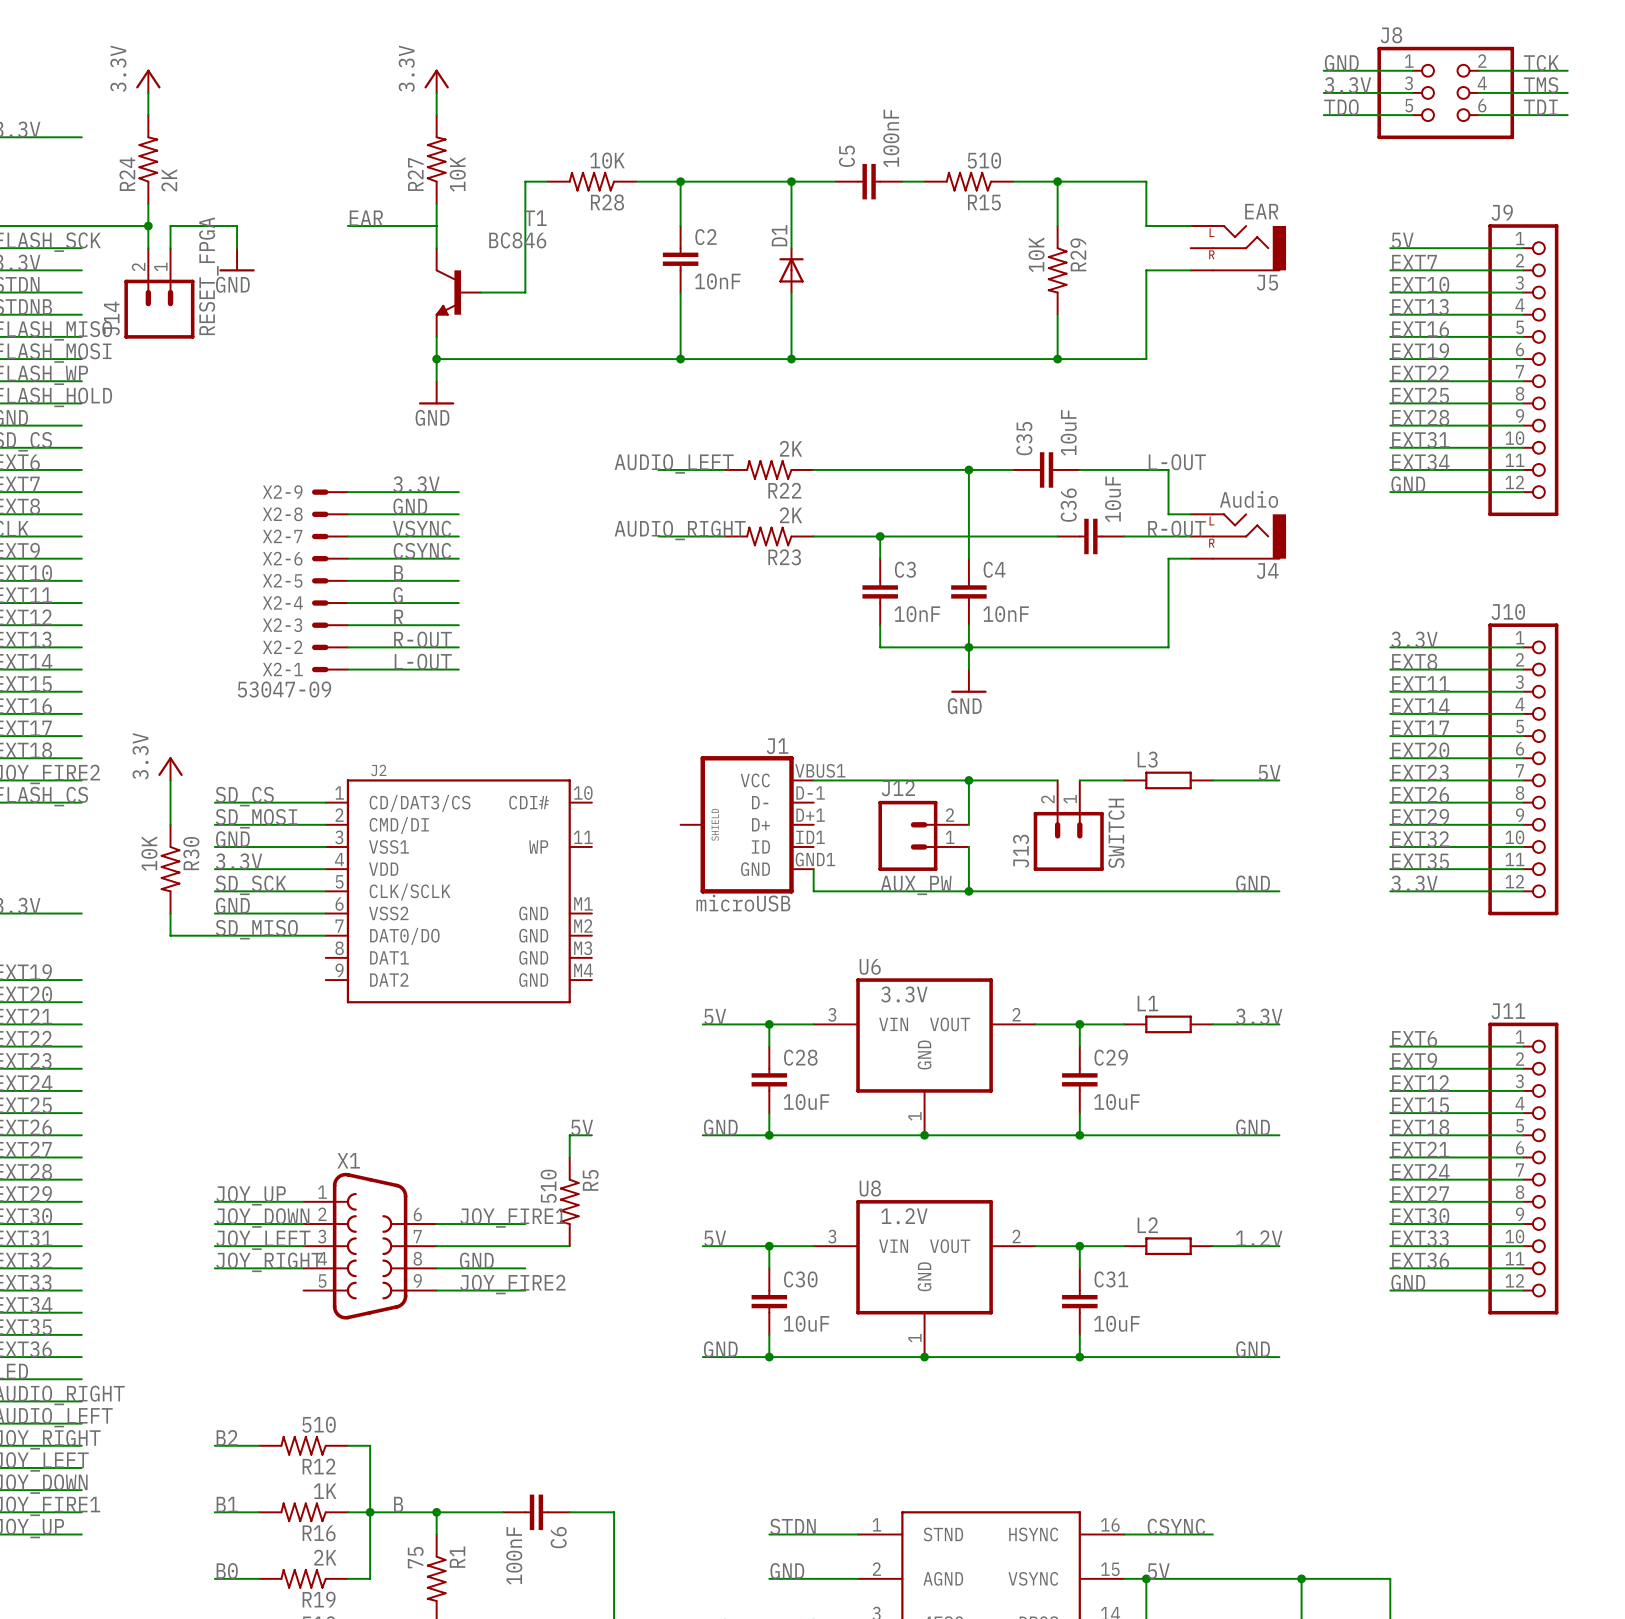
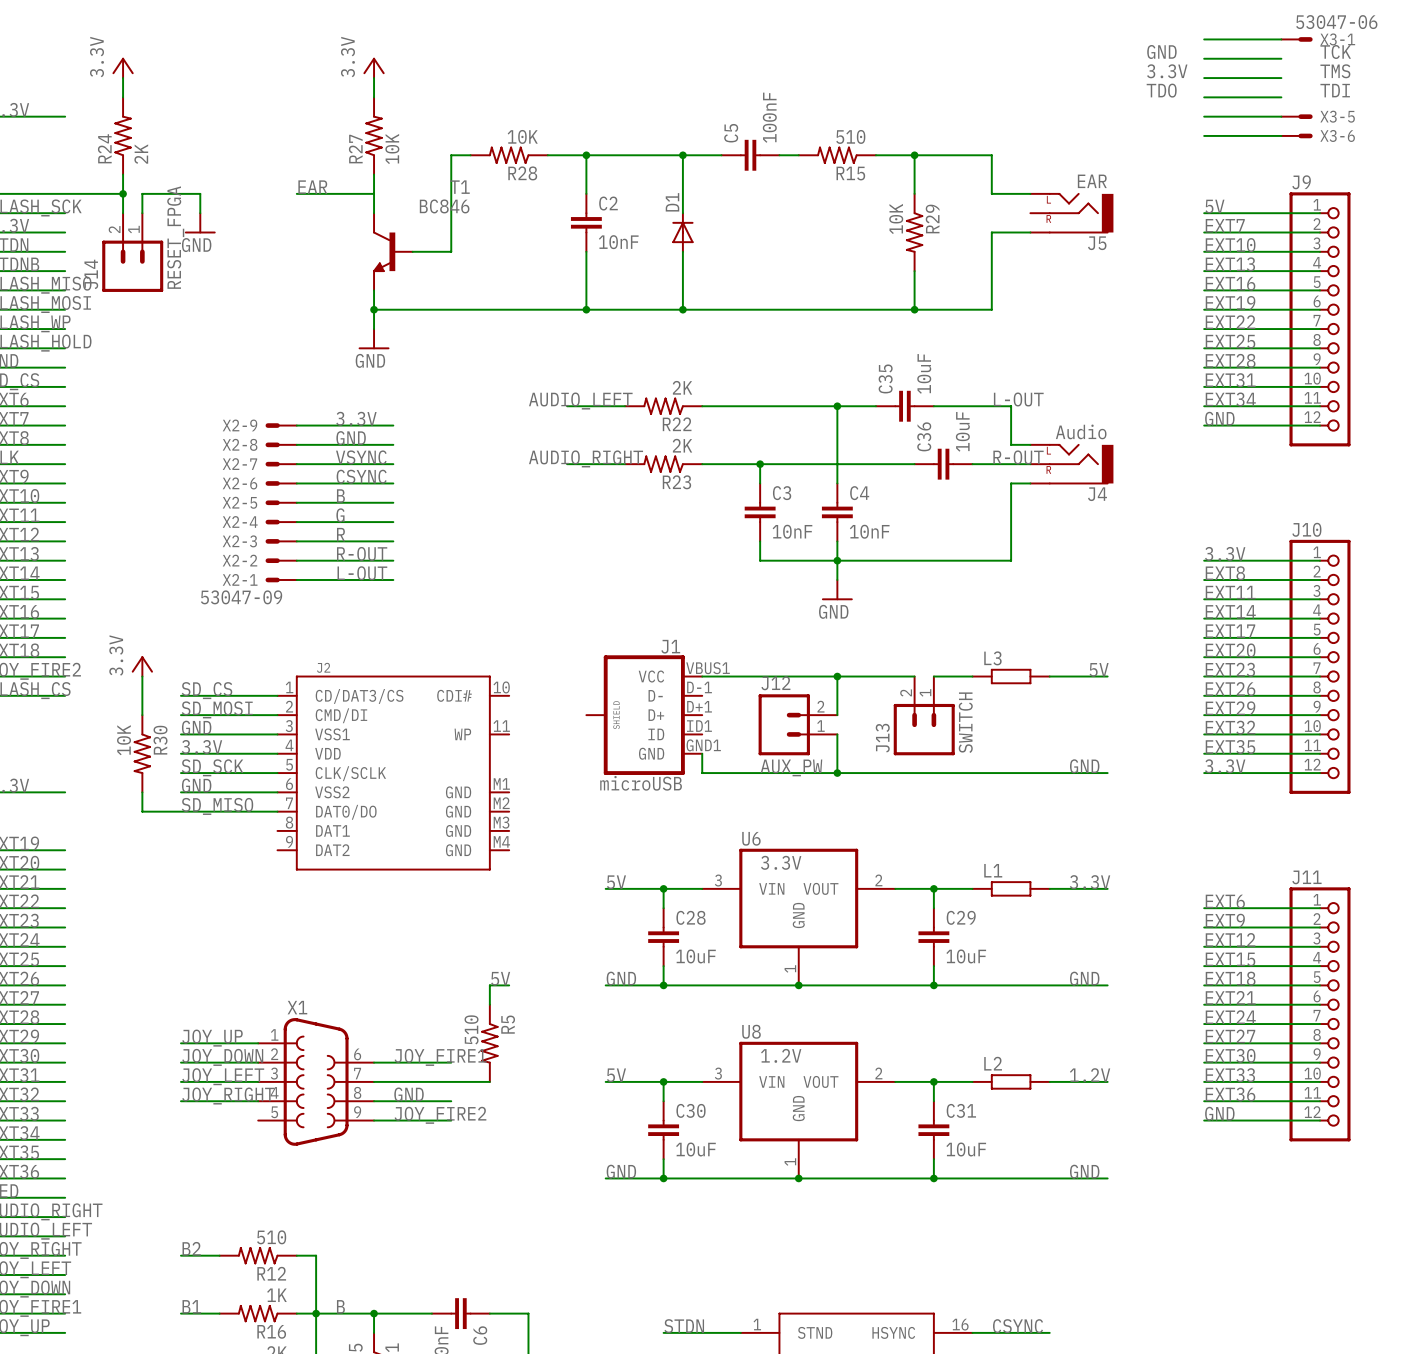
X3-1: none -> 53047-06 (1297, 39)
wire: (1323, 70) (1390, 70) -> none
wire: (1479, 70) (1567, 70) -> (1281, 58) (1223, 58)
wire: (1323, 92) (1390, 92) -> none
J8: (1445, 92) -> none
wire: (1479, 92) (1567, 92) -> (1281, 78) (1223, 78)
wire: (1323, 115) (1390, 115) -> none
wire: (1479, 115) (1567, 115) -> (1281, 97) (1223, 97)
X3-5: none -> (1297, 116)
wire: none -> (1204, 135) (1281, 135)
X3-6: none -> (1297, 135)

